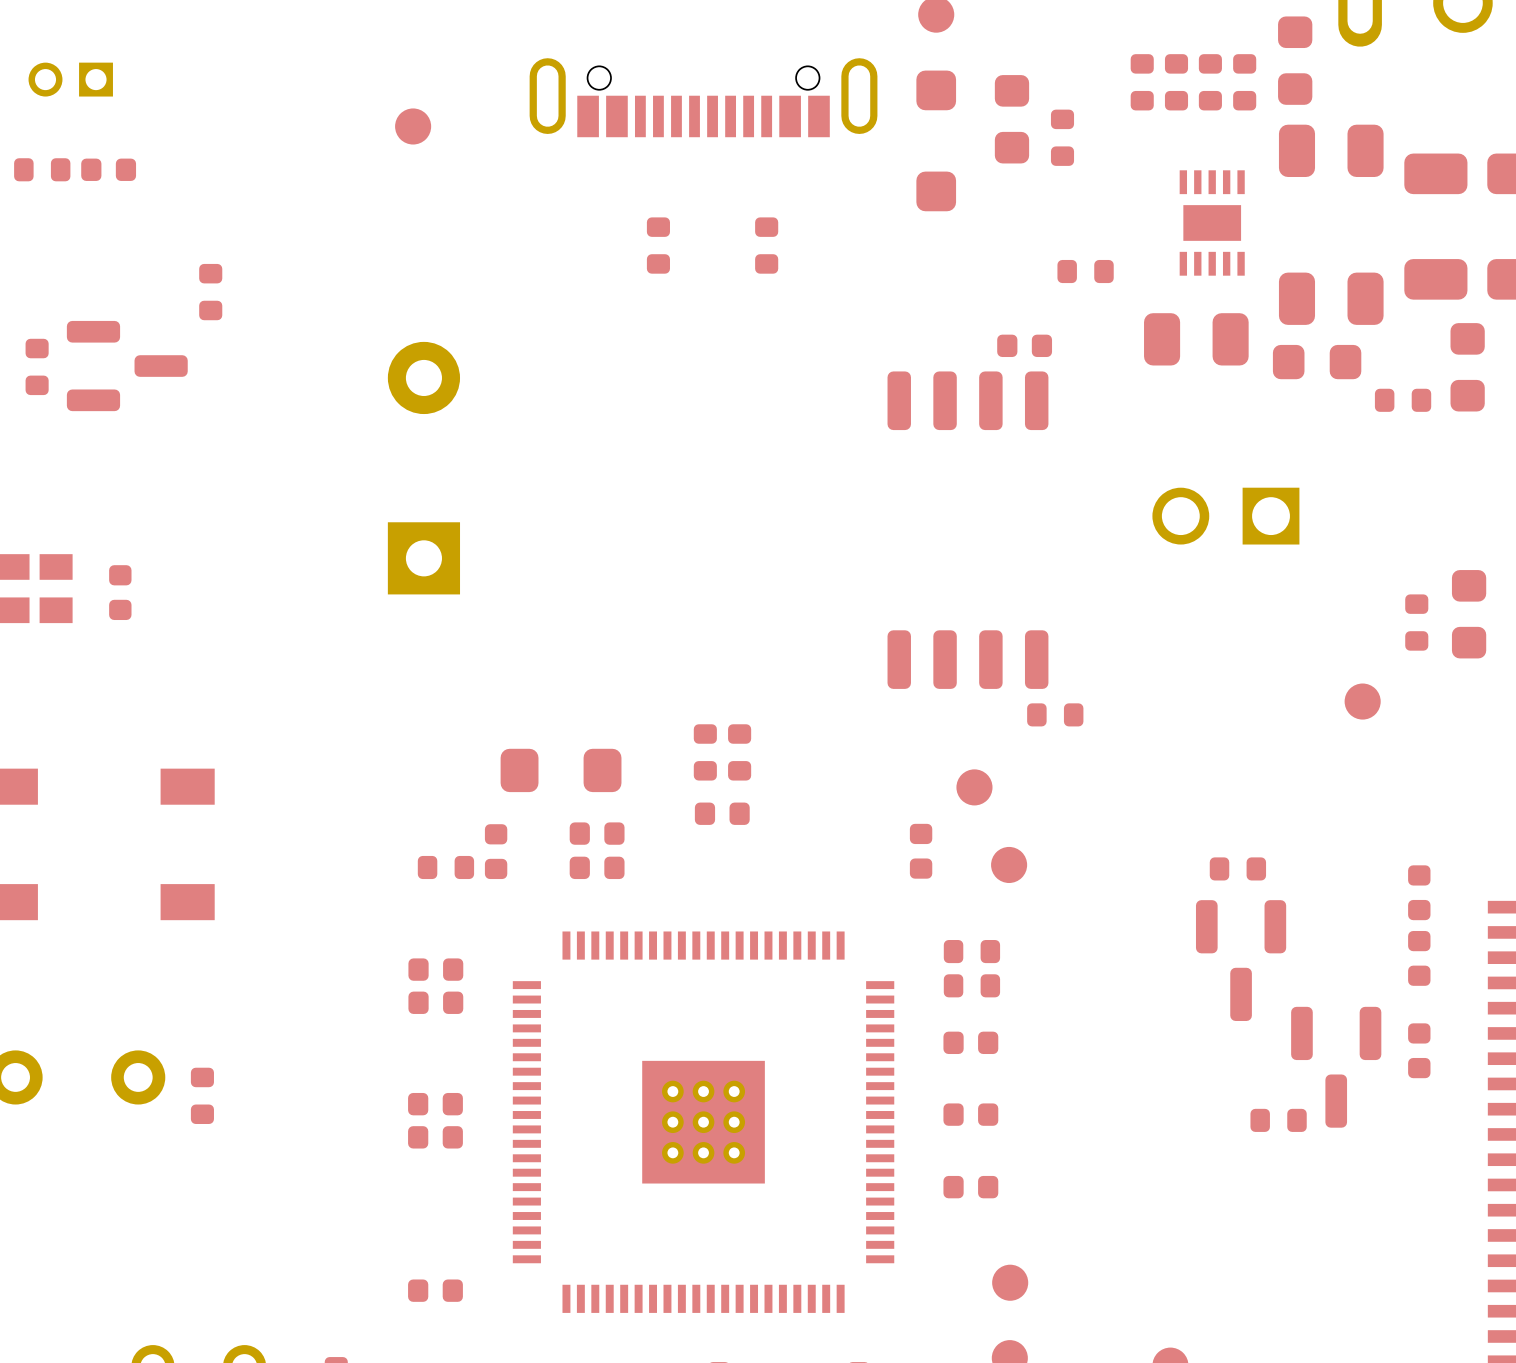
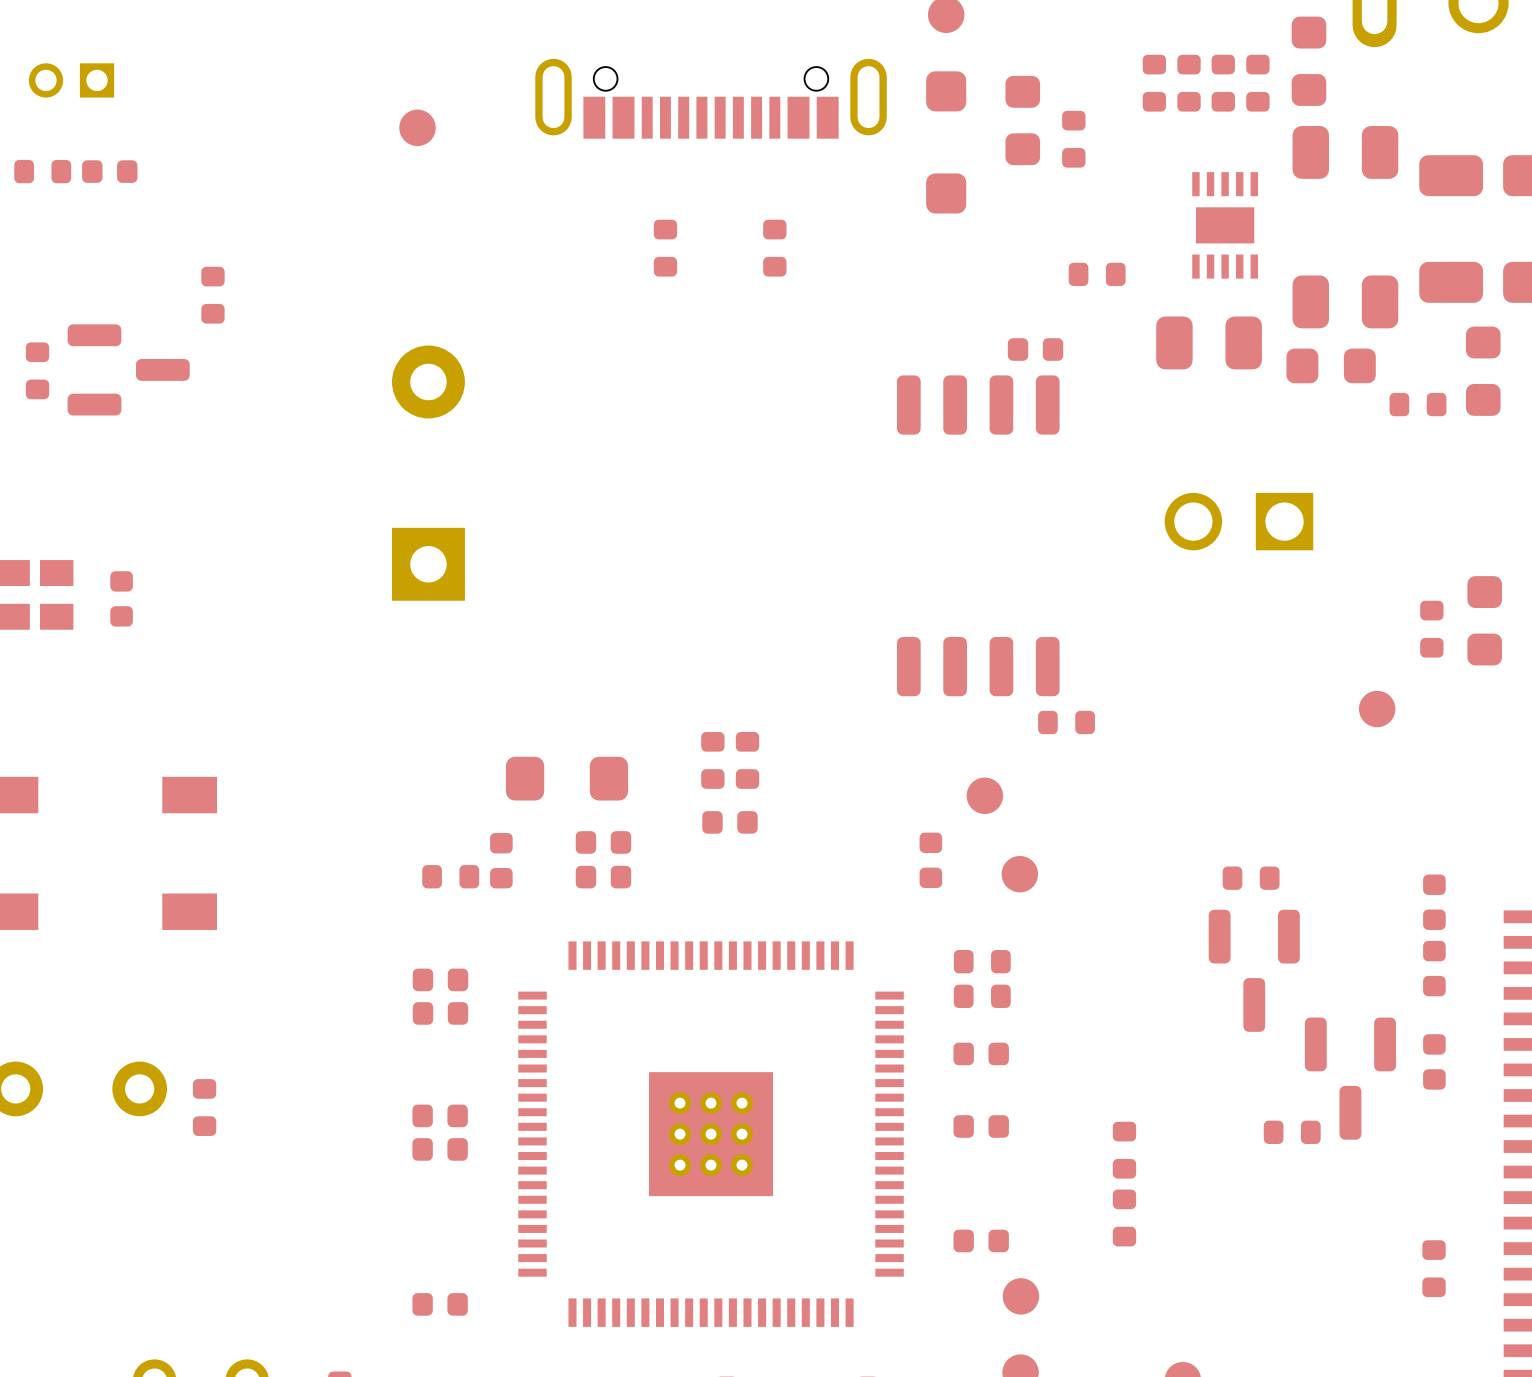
part: none -> (1124, 1150)
part position: (970, 1187) -> (981, 1240)
part: none -> (1124, 1217)
part: none -> (1434, 1268)

